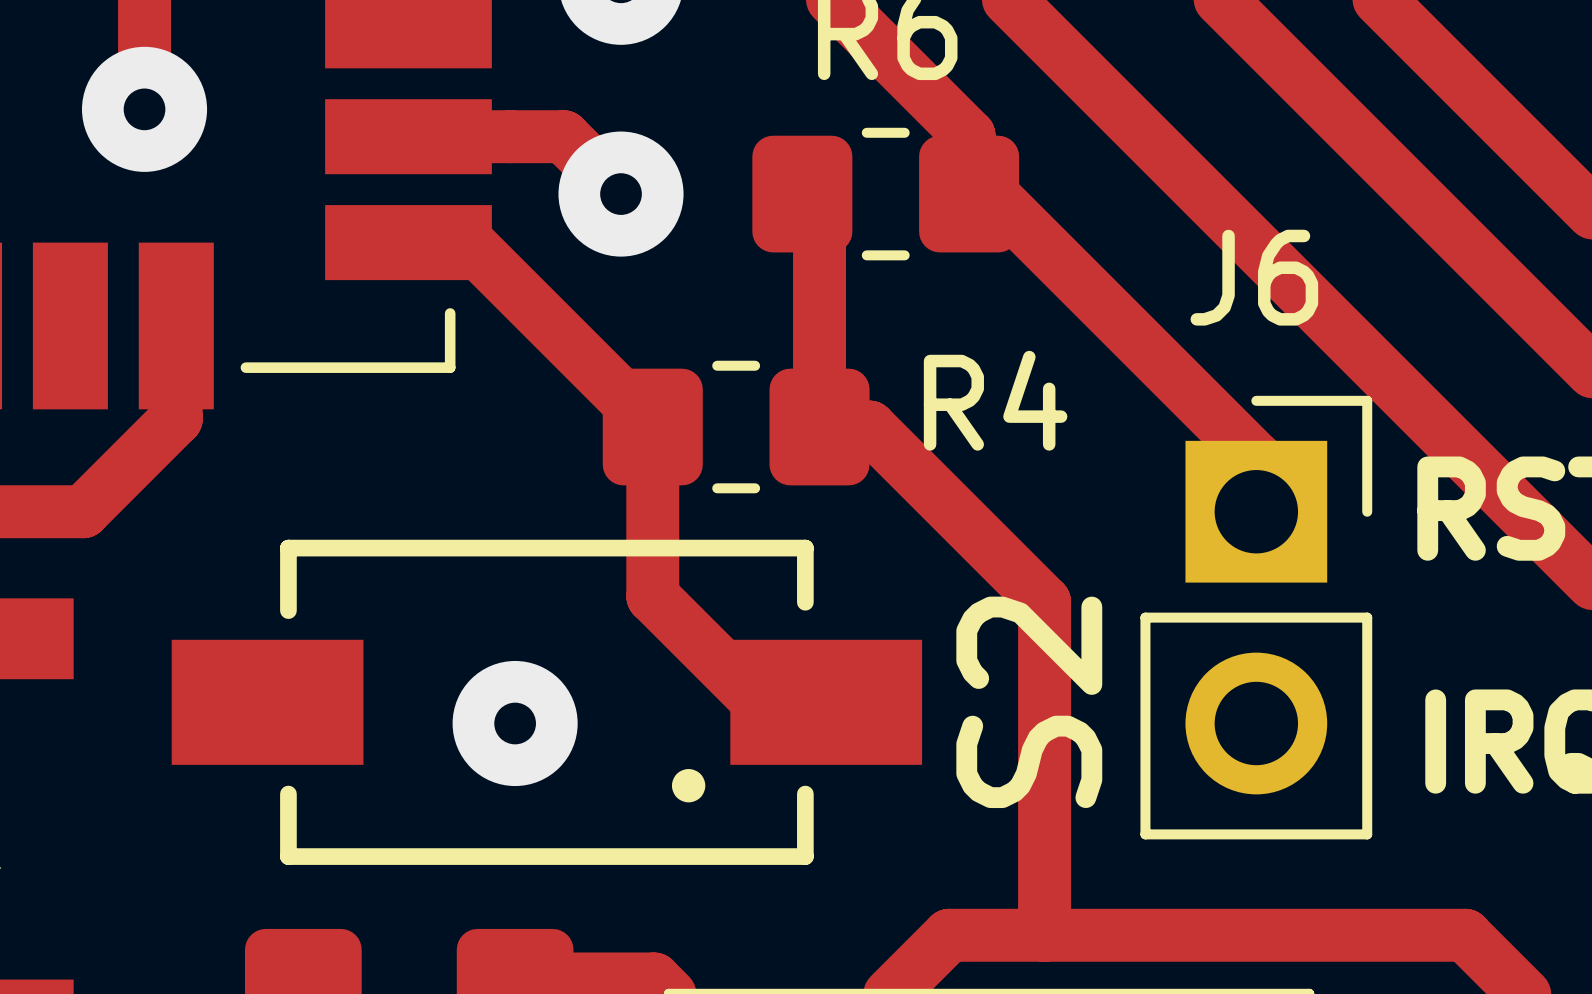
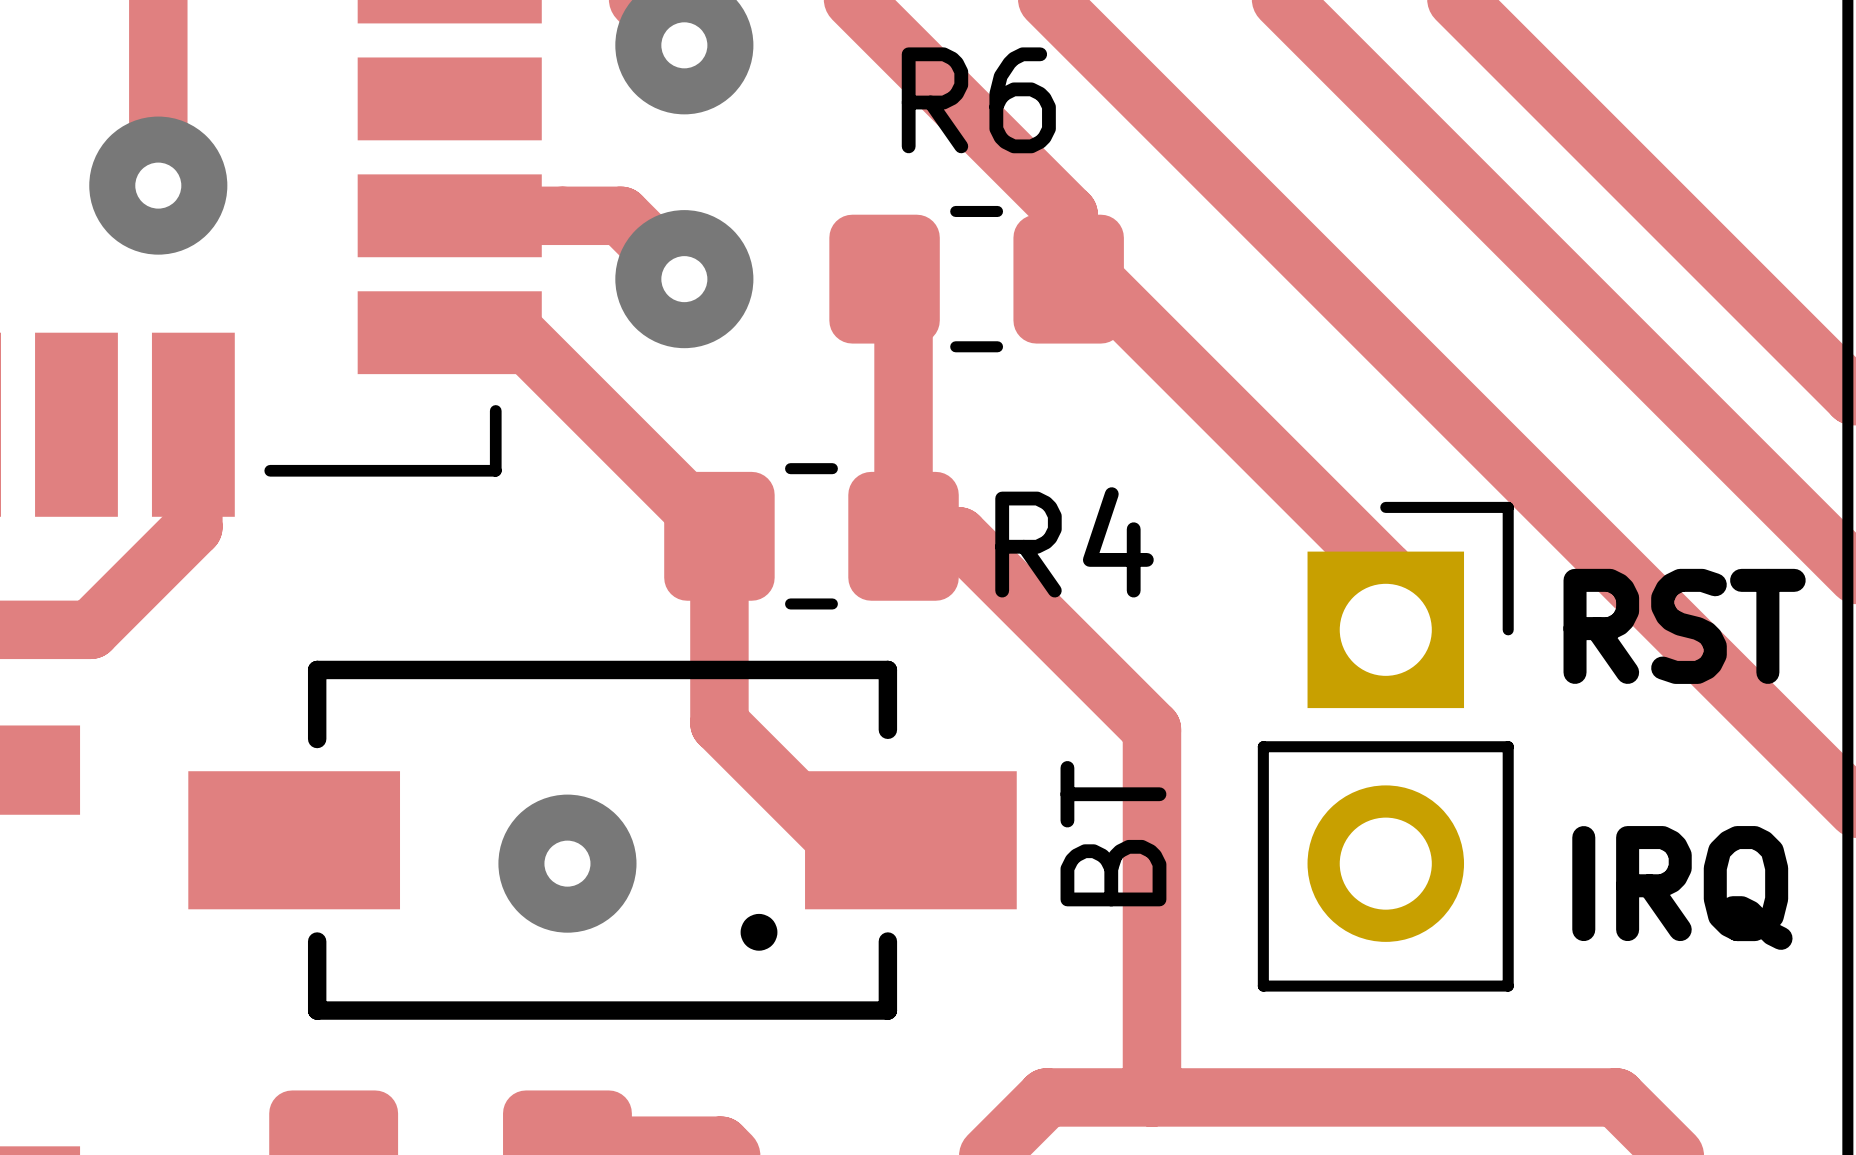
J6 name: J6 (1254, 277) -> none
R4 name position: R4 (995, 400) -> R4 (1074, 542)
S2 name: S2 (1029, 702) -> BT (1113, 833)

